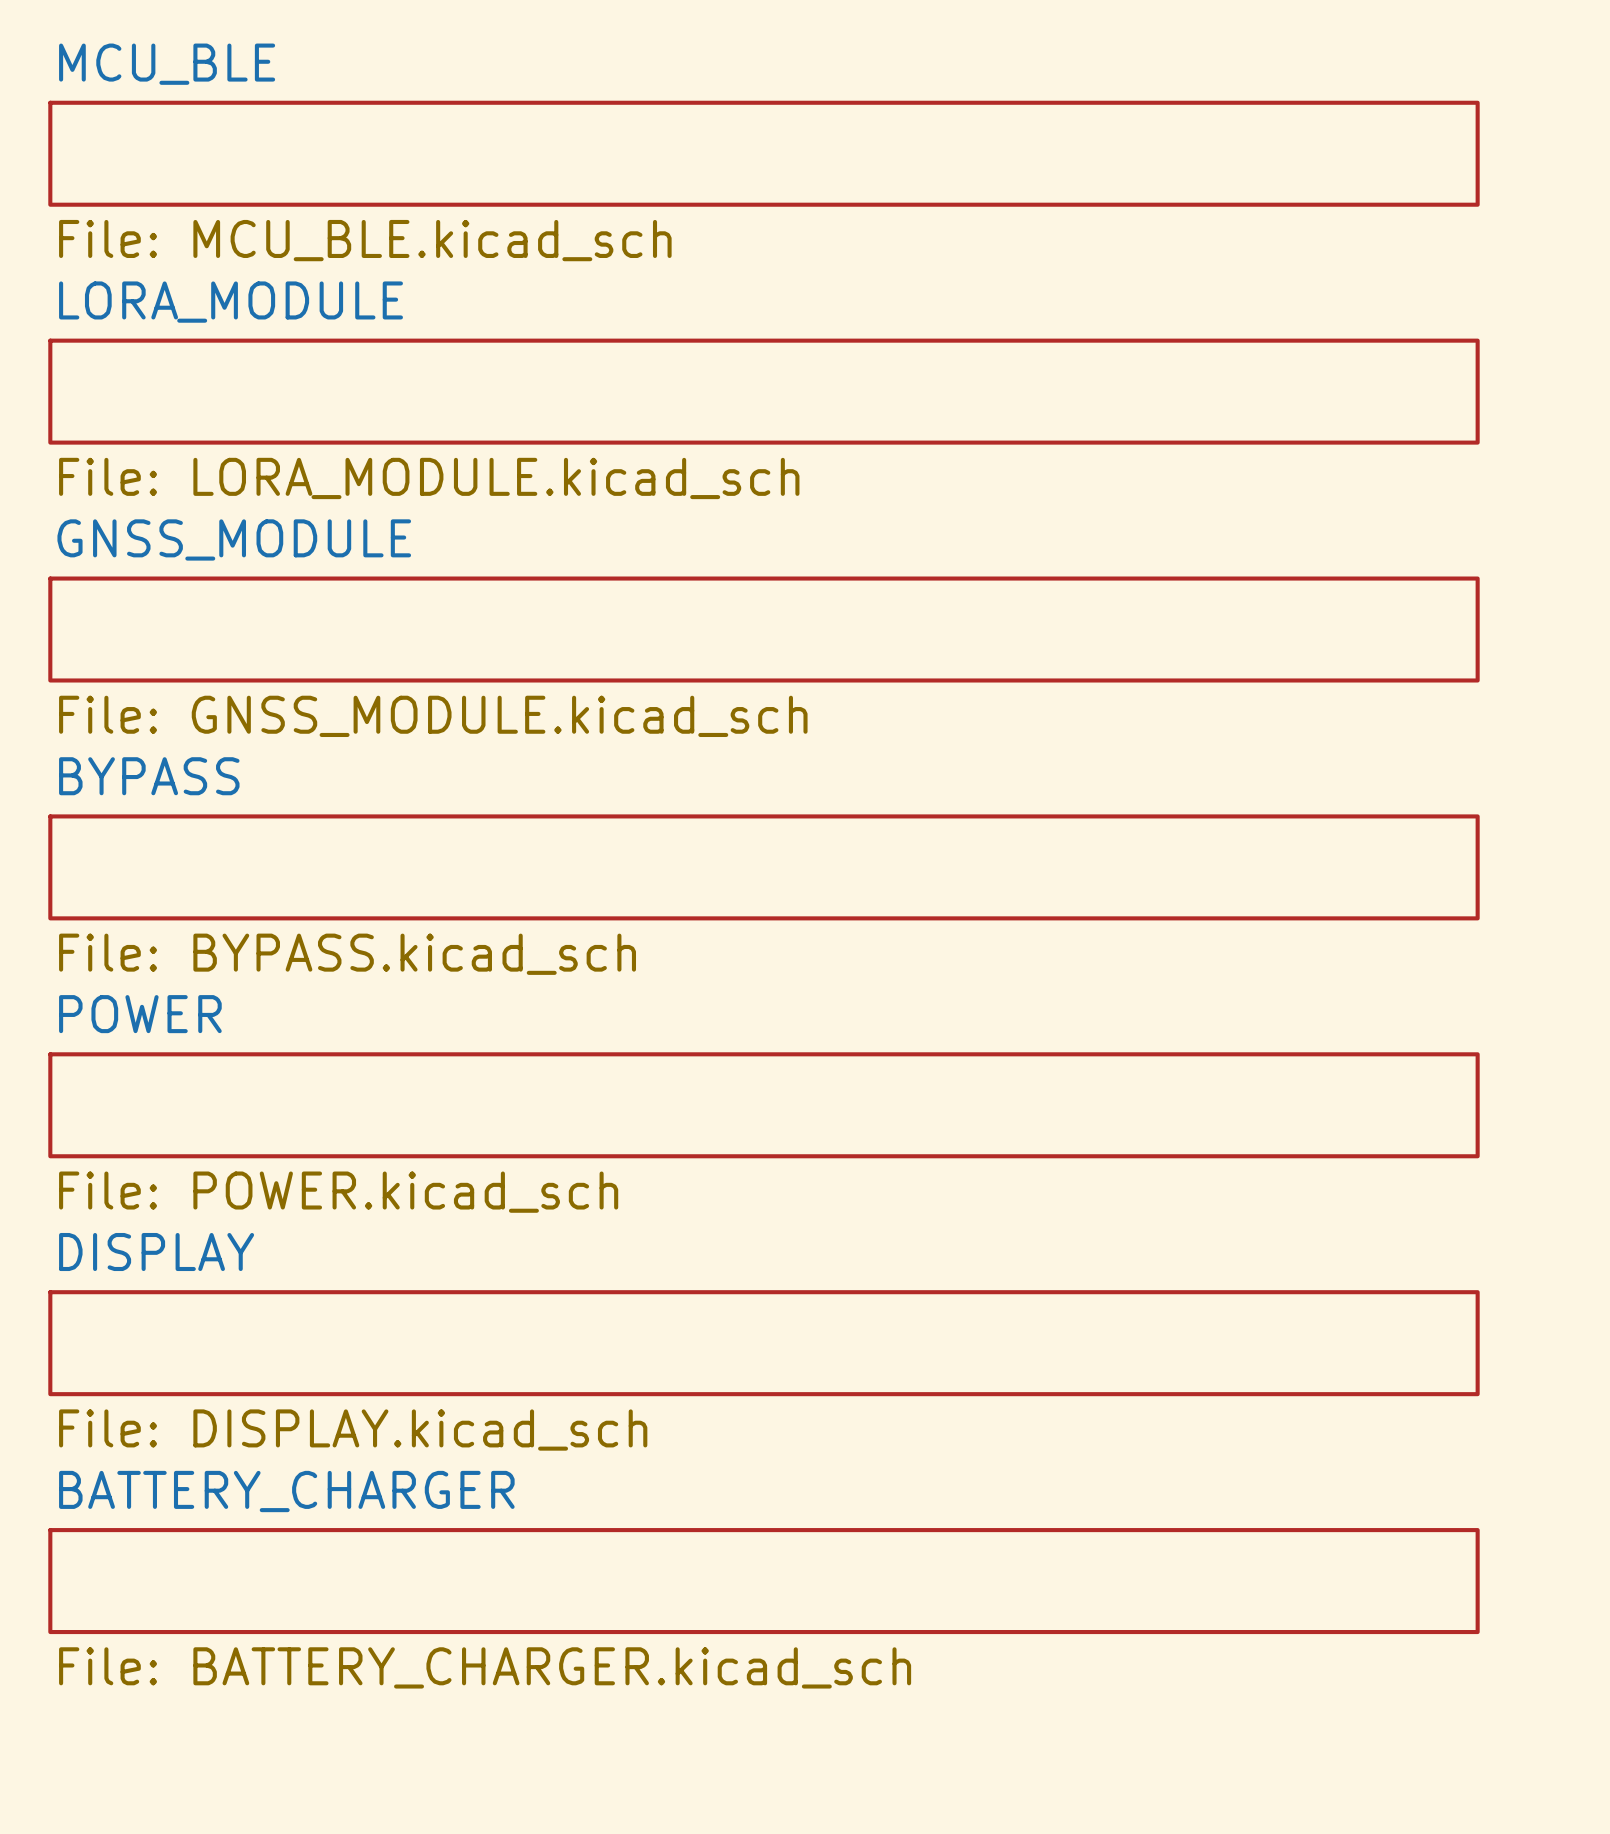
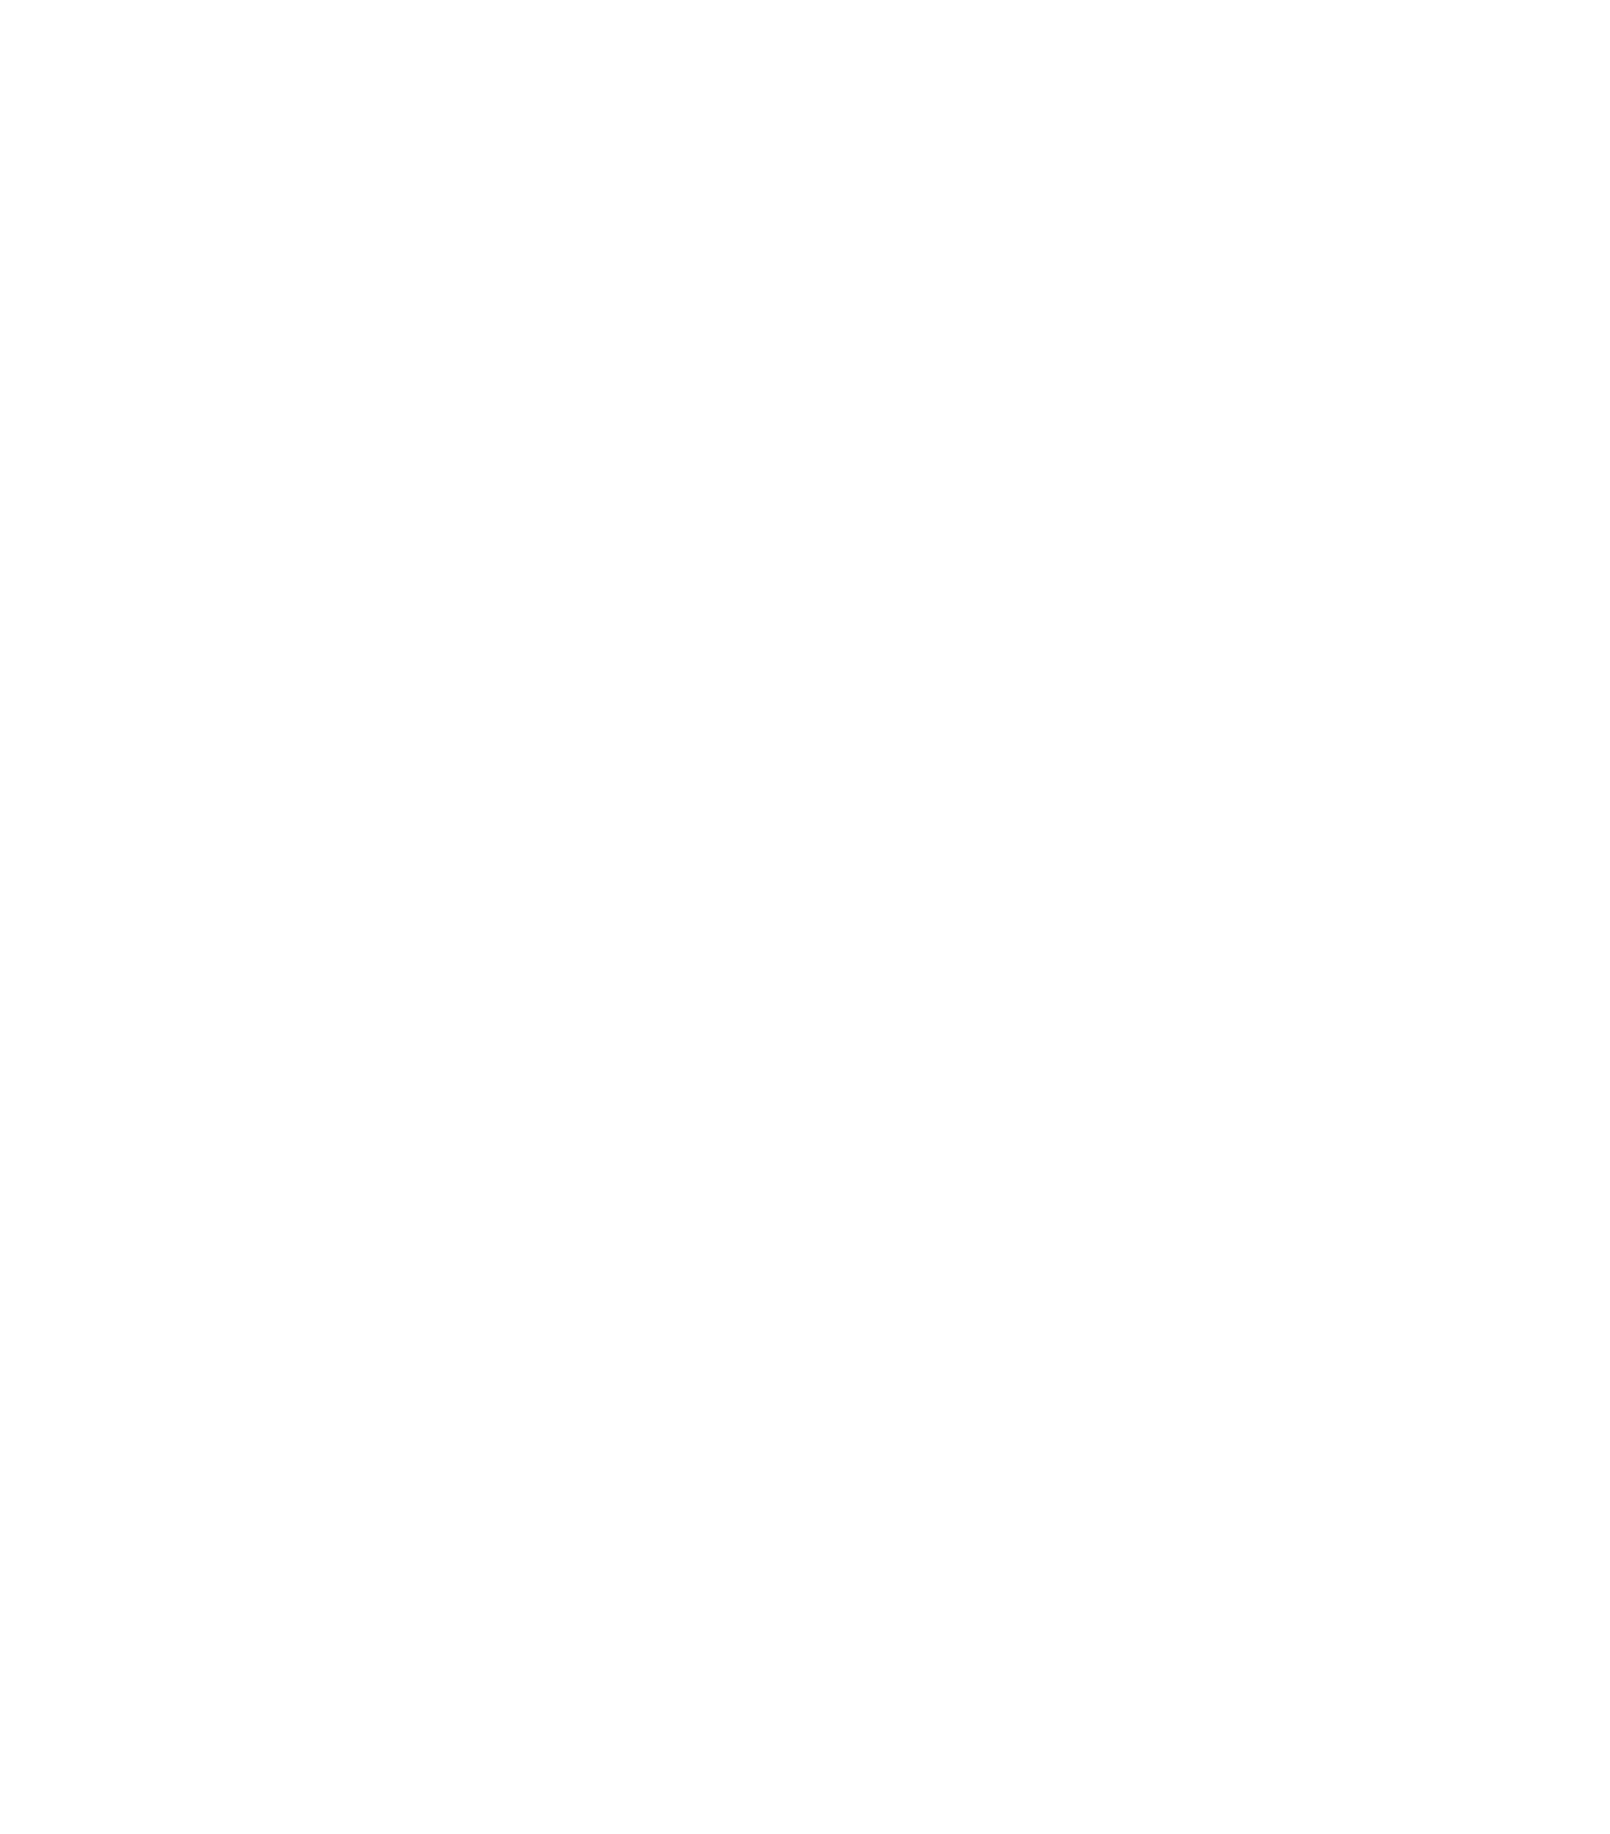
sheet MCU_BLE: File: MCU_BLE.kicad_sch (763, 153) -> none
sheet LORA_MODULE: File: LORA_MODULE.kicad_sch (763, 391) -> none
sheet GNSS_MODULE: File: GNSS_MODULE.kicad_sch (763, 629) -> none
sheet BYPASS: File: BYPASS.kicad_sch (763, 867) -> none
sheet POWER: File: POWER.kicad_sch (763, 1105) -> none
sheet DISPLAY: File: DISPLAY.kicad_sch (763, 1343) -> none
sheet BATTERY_CHARGER: File: BATTERY_CHARGER.kicad_sch (763, 1581) -> none

